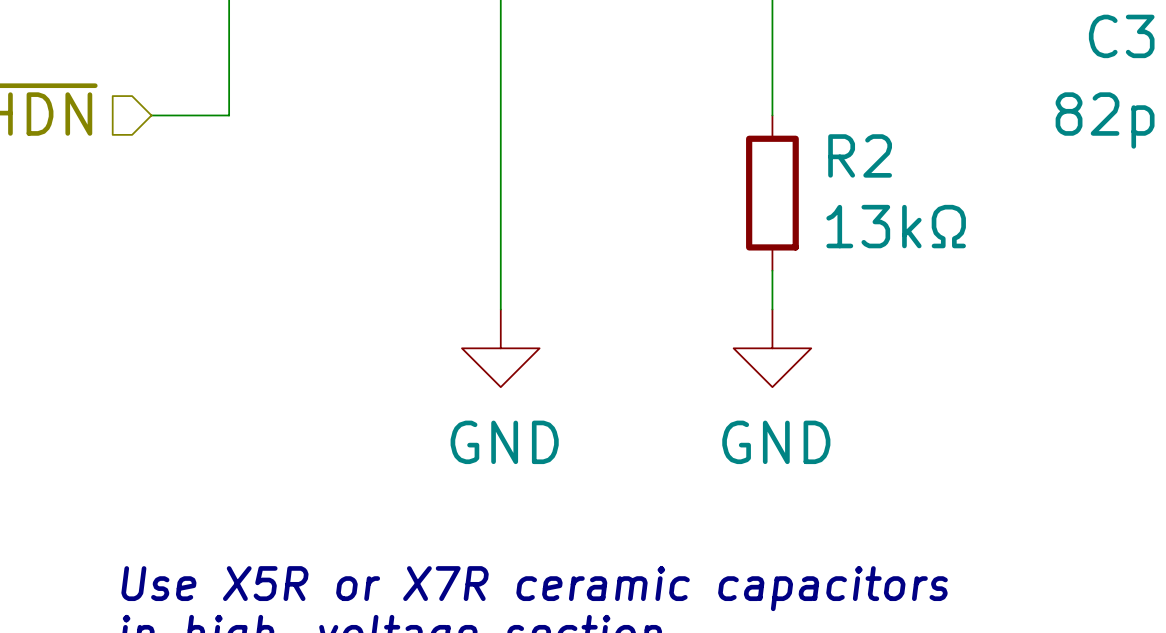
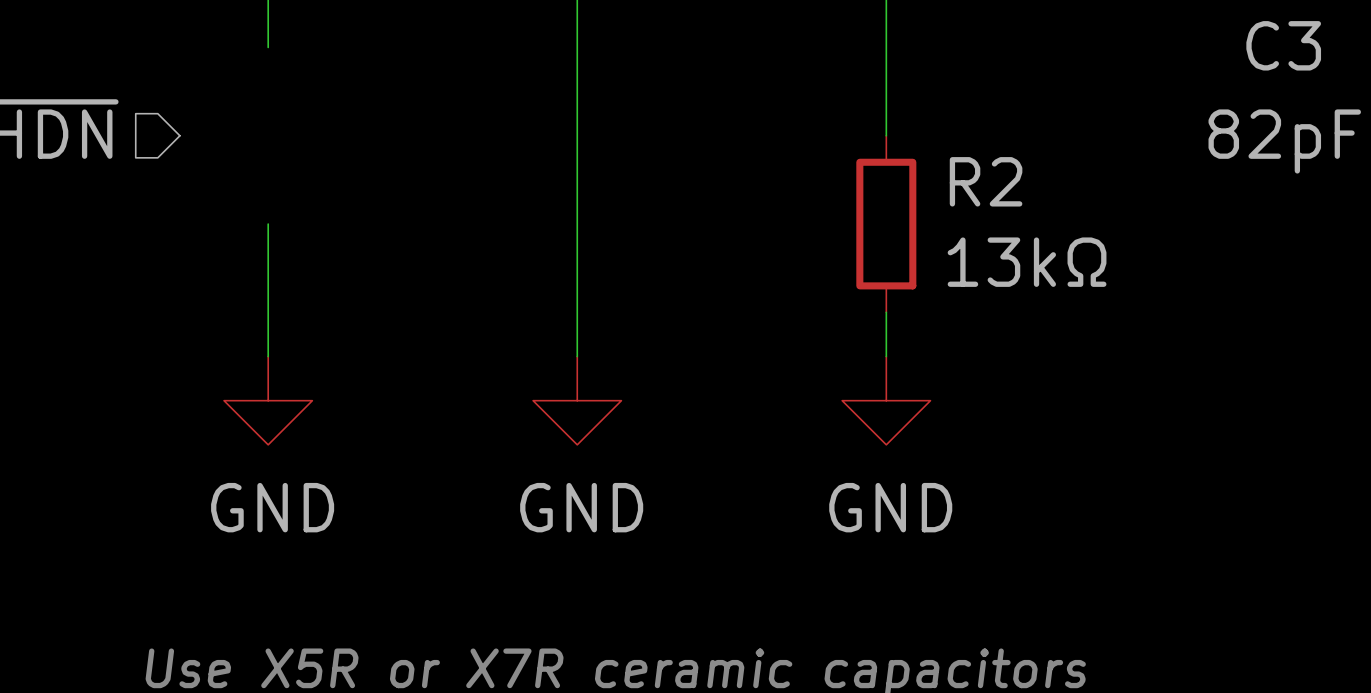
wire: (229, 37) (229, 115) (151, 115) -> none
wire: none -> (268, 224) (268, 356)
power symbol: none -> GND (268, 400)

